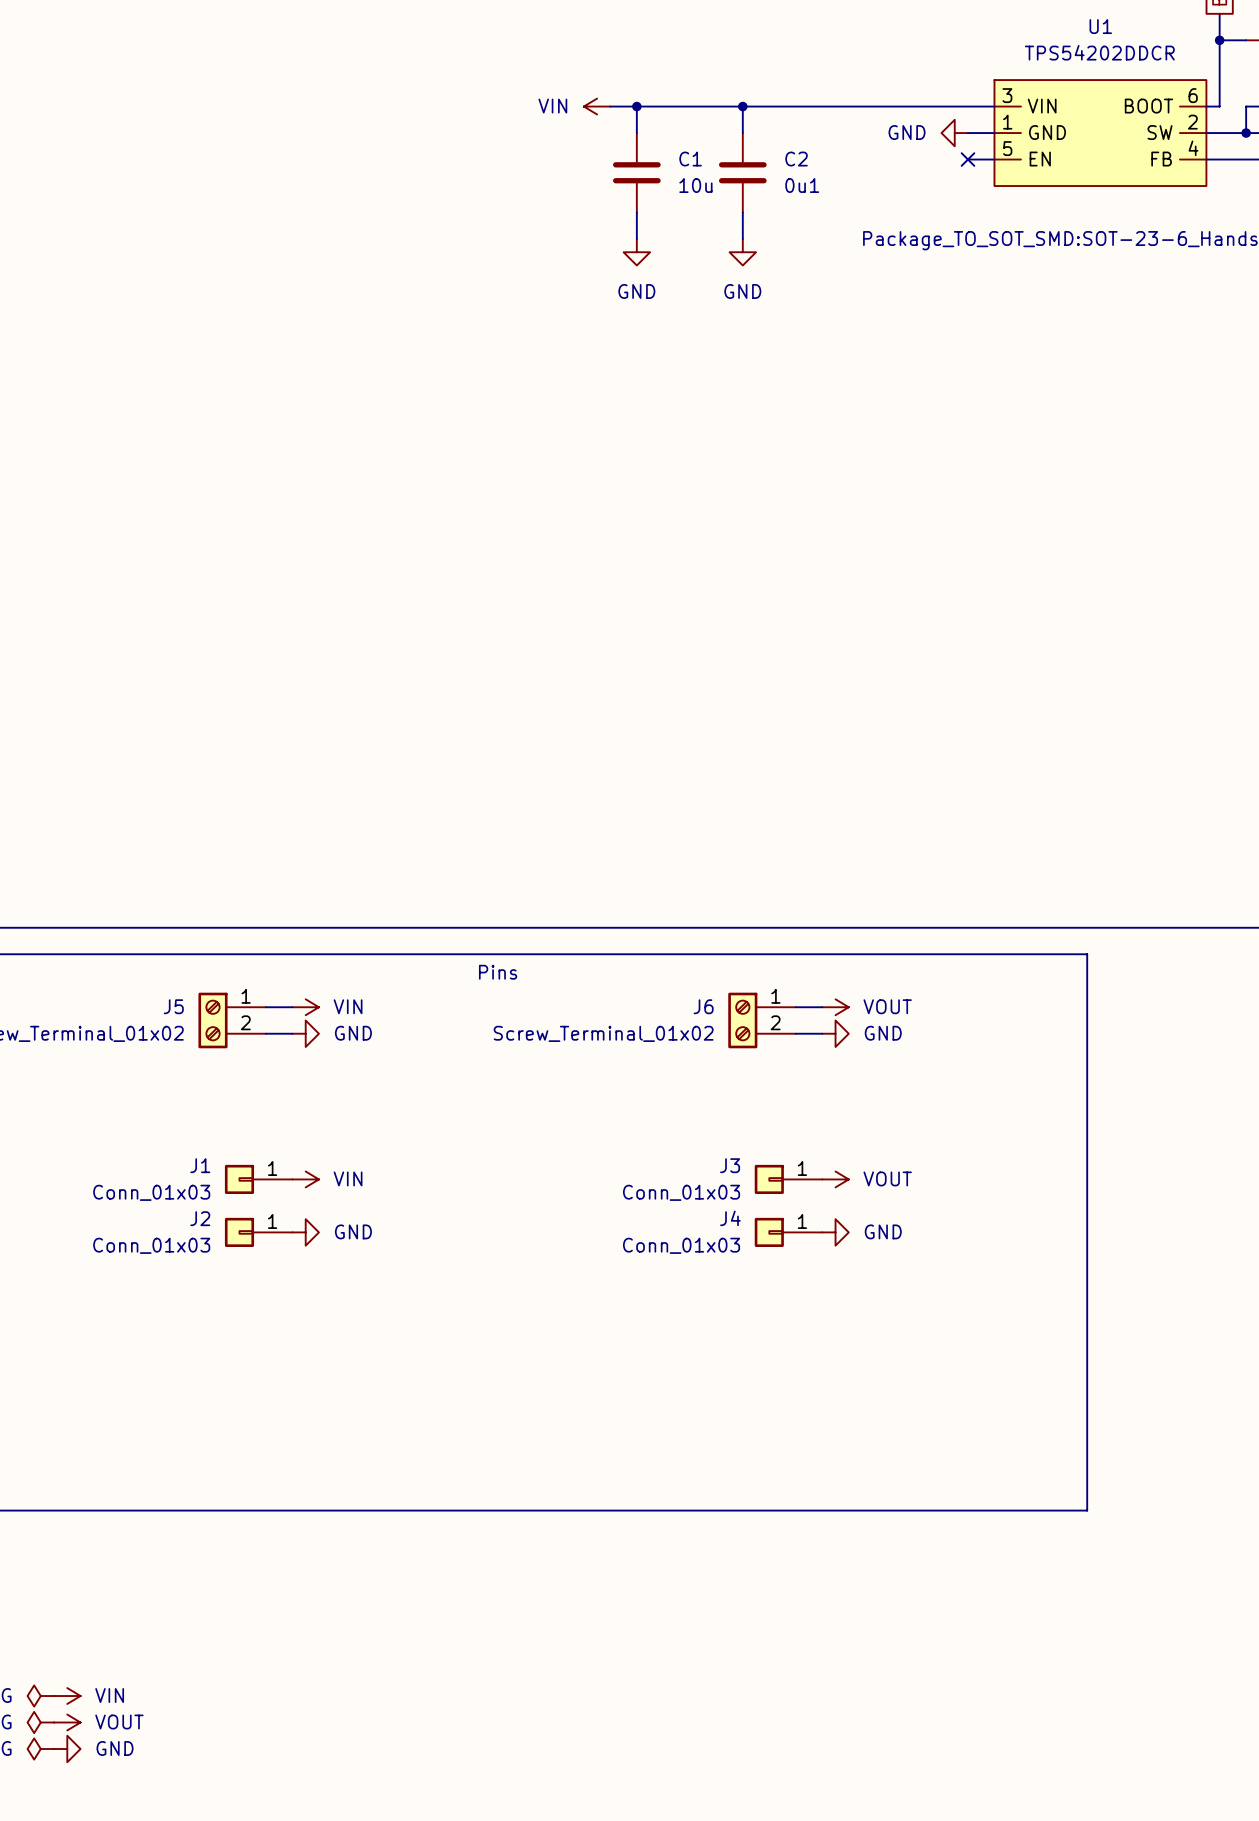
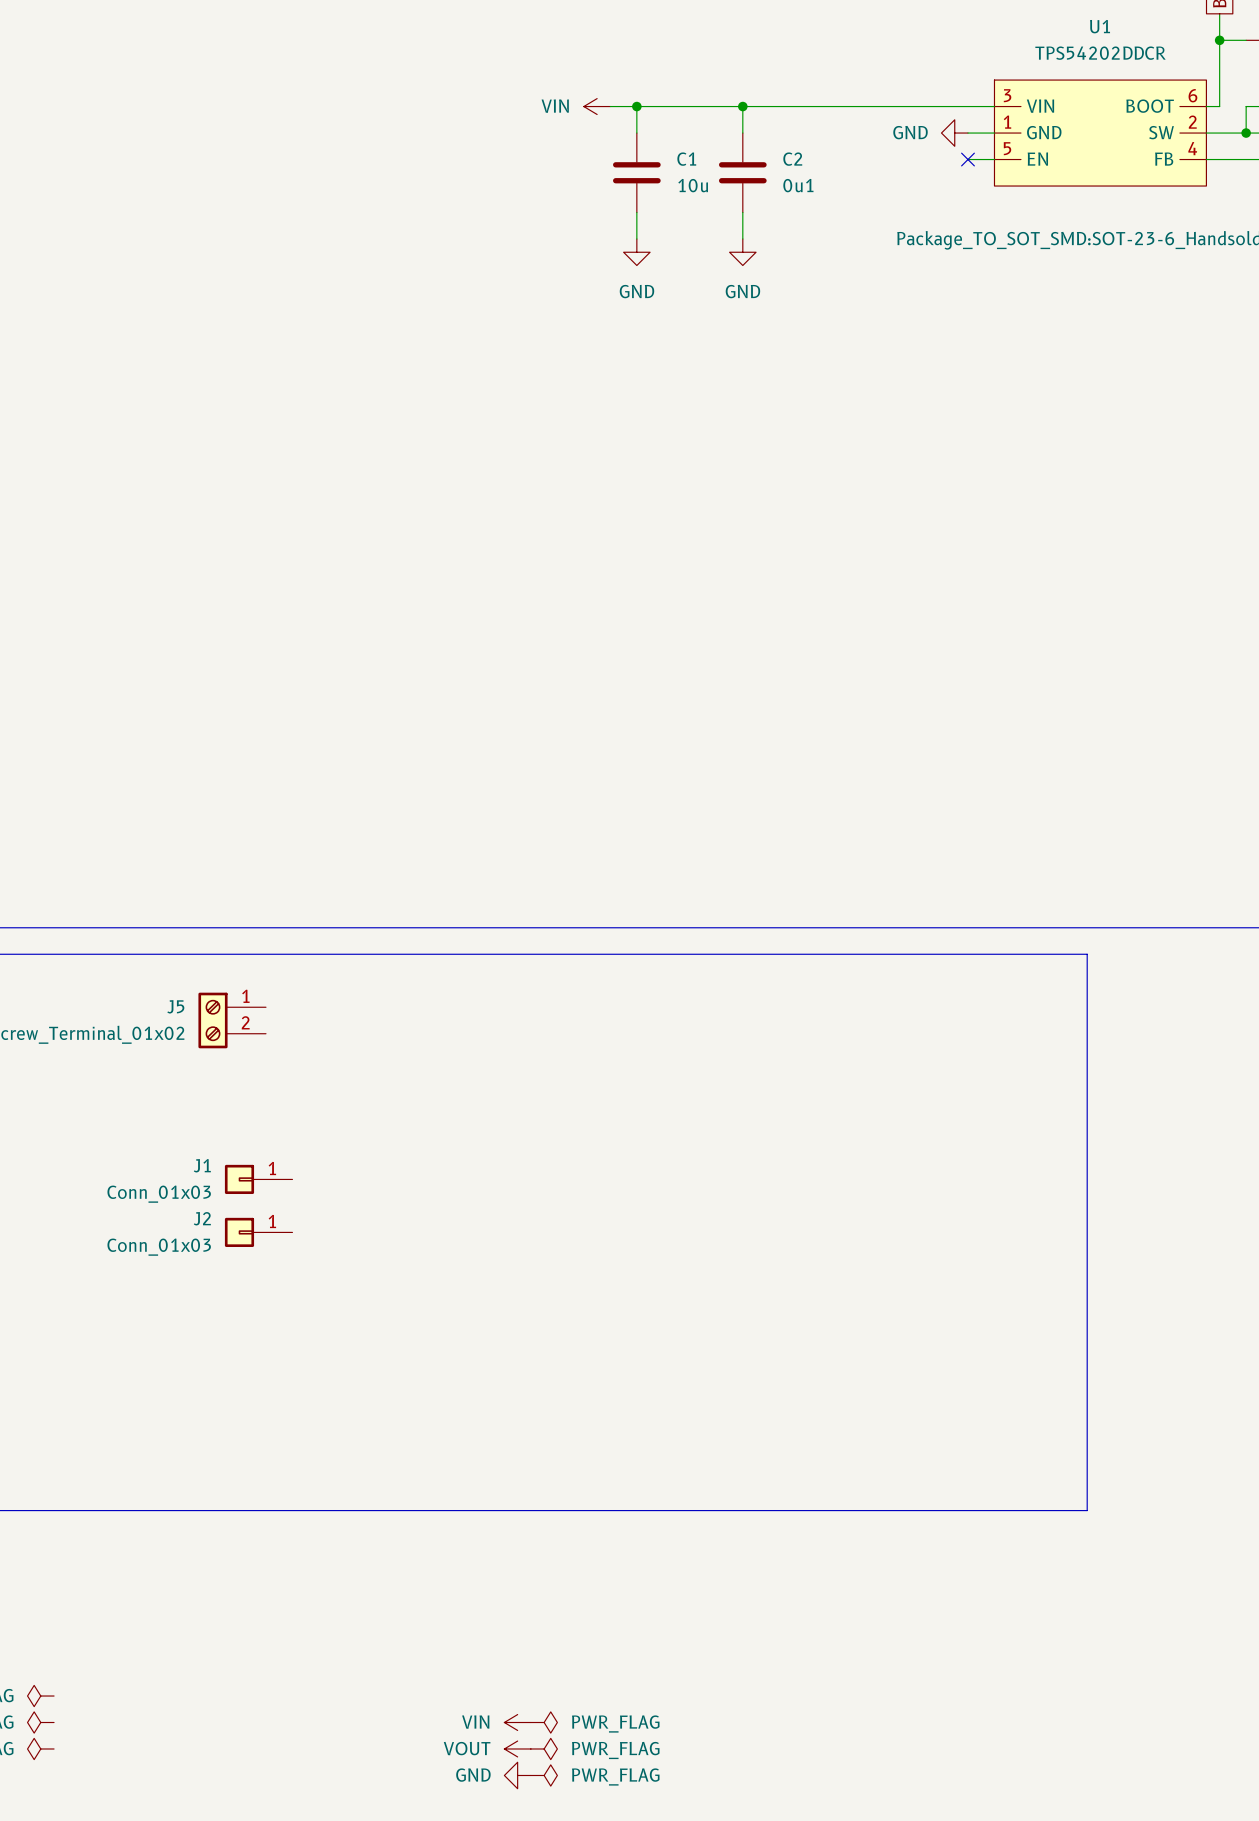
text: Pins (498, 972) -> none
wire: (265, 1007) (292, 1007) -> none
power symbol: VIN (305, 1007) -> none
wire: (795, 1007) (822, 1007) -> none
power symbol: VOUT (835, 1007) -> none
J6: Screw_Terminal_01x02 (762, 1020) -> none
wire: (265, 1033) (292, 1033) -> none
power symbol: GND (305, 1033) -> none
wire: (795, 1033) (822, 1033) -> none
power symbol: GND (835, 1033) -> none
power symbol: VIN (305, 1179) -> none
J3: Conn_01x03 (788, 1179) -> none
power symbol: VOUT (835, 1179) -> none
power symbol: GND (305, 1232) -> none
J4: Conn_01x03 (788, 1232) -> none
power symbol: GND (835, 1232) -> none
power symbol: VIN (67, 1696) -> none
power symbol: VOUT (67, 1722) -> none
power symbol: none -> VIN (517, 1722)
power symbol: none -> PWR_FLAG (544, 1722)
power symbol: GND (67, 1748) -> none
power symbol: none -> VOUT (517, 1748)
power symbol: none -> PWR_FLAG (544, 1748)
power symbol: none -> GND (517, 1775)
power symbol: none -> PWR_FLAG (544, 1775)

